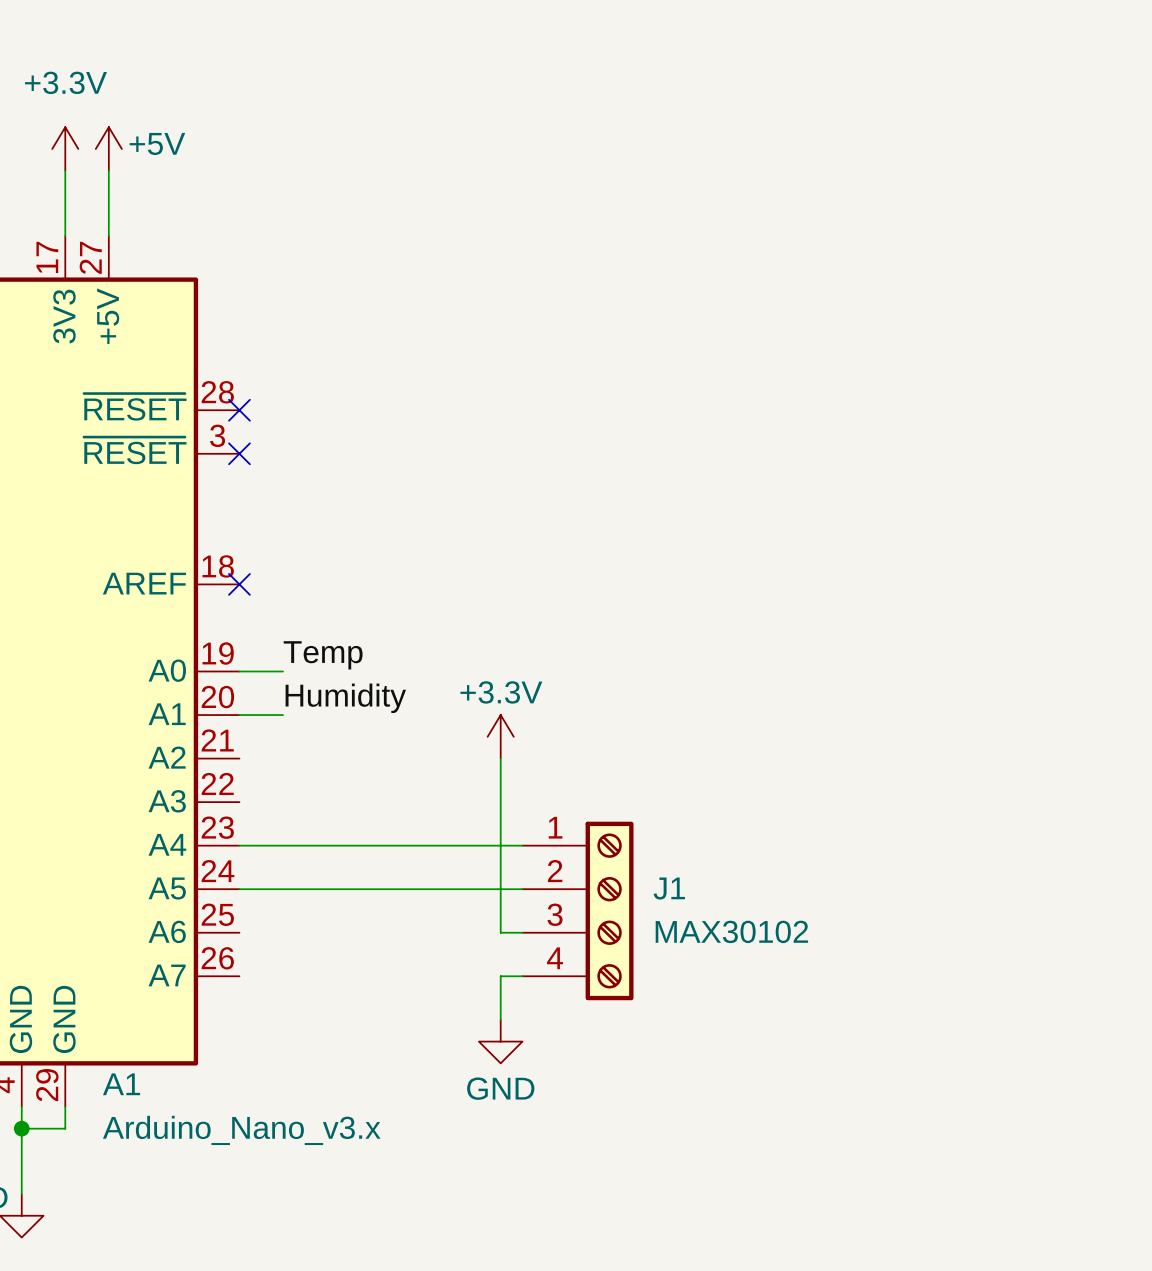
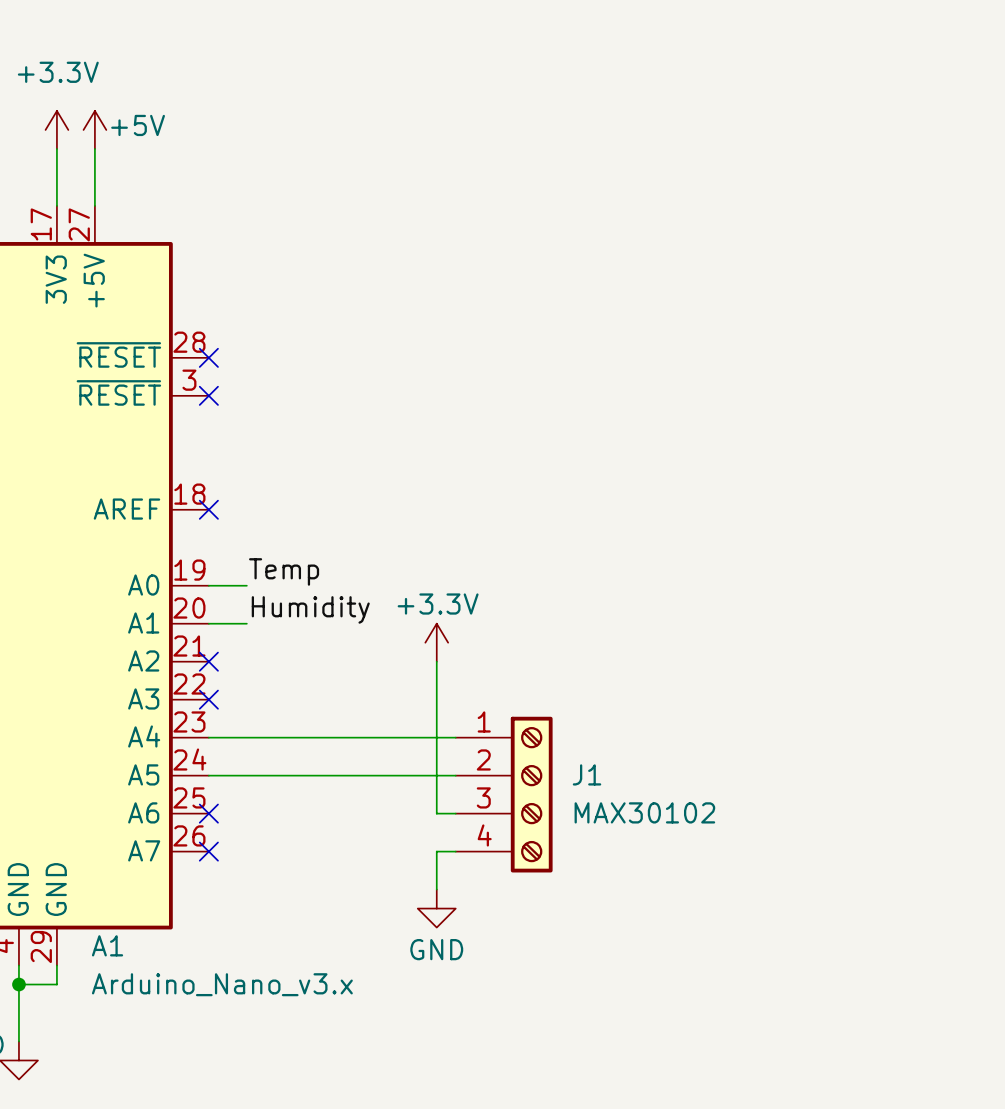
no-connect mark: none -> (208, 661)
no-connect mark: none -> (208, 699)
no-connect mark: none -> (208, 813)
no-connect mark: none -> (208, 851)

